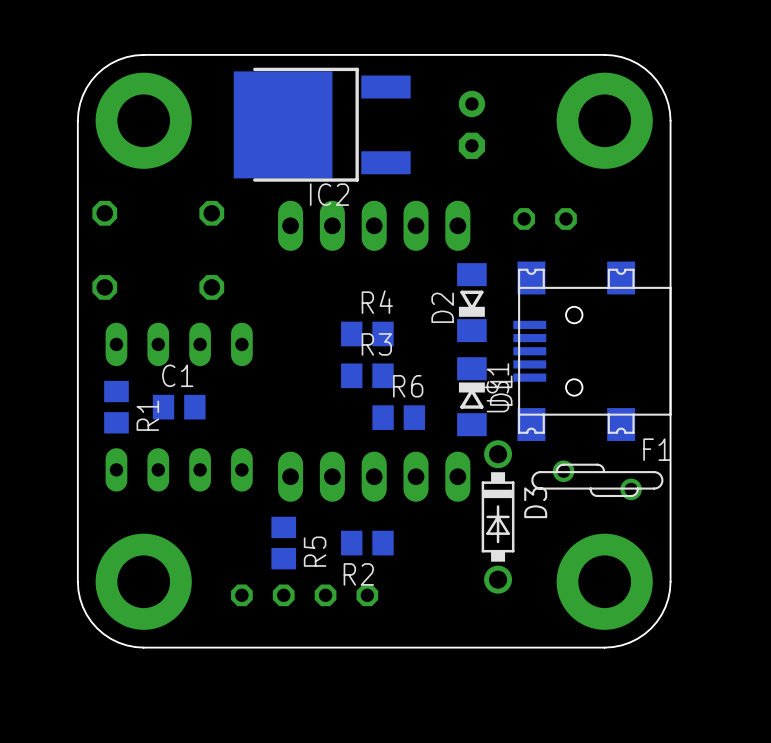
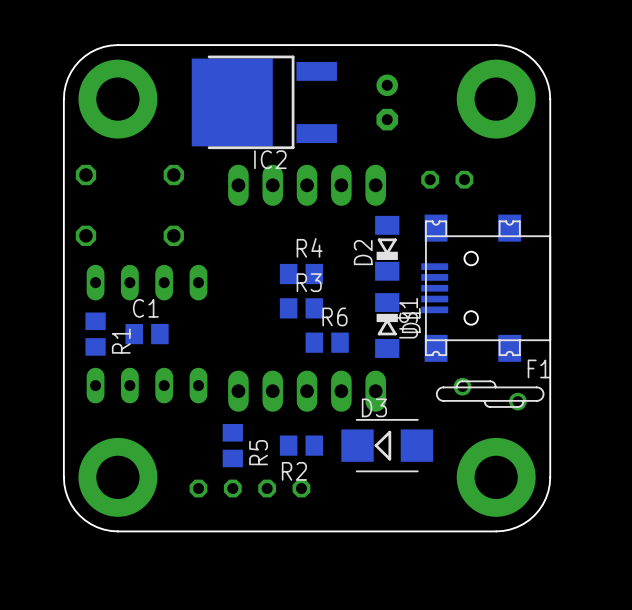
D3 footprint: [481, 440, 515, 594] -> [341, 419, 434, 473]
D3 name position: D3 (535, 502) -> D3 (374, 407)

